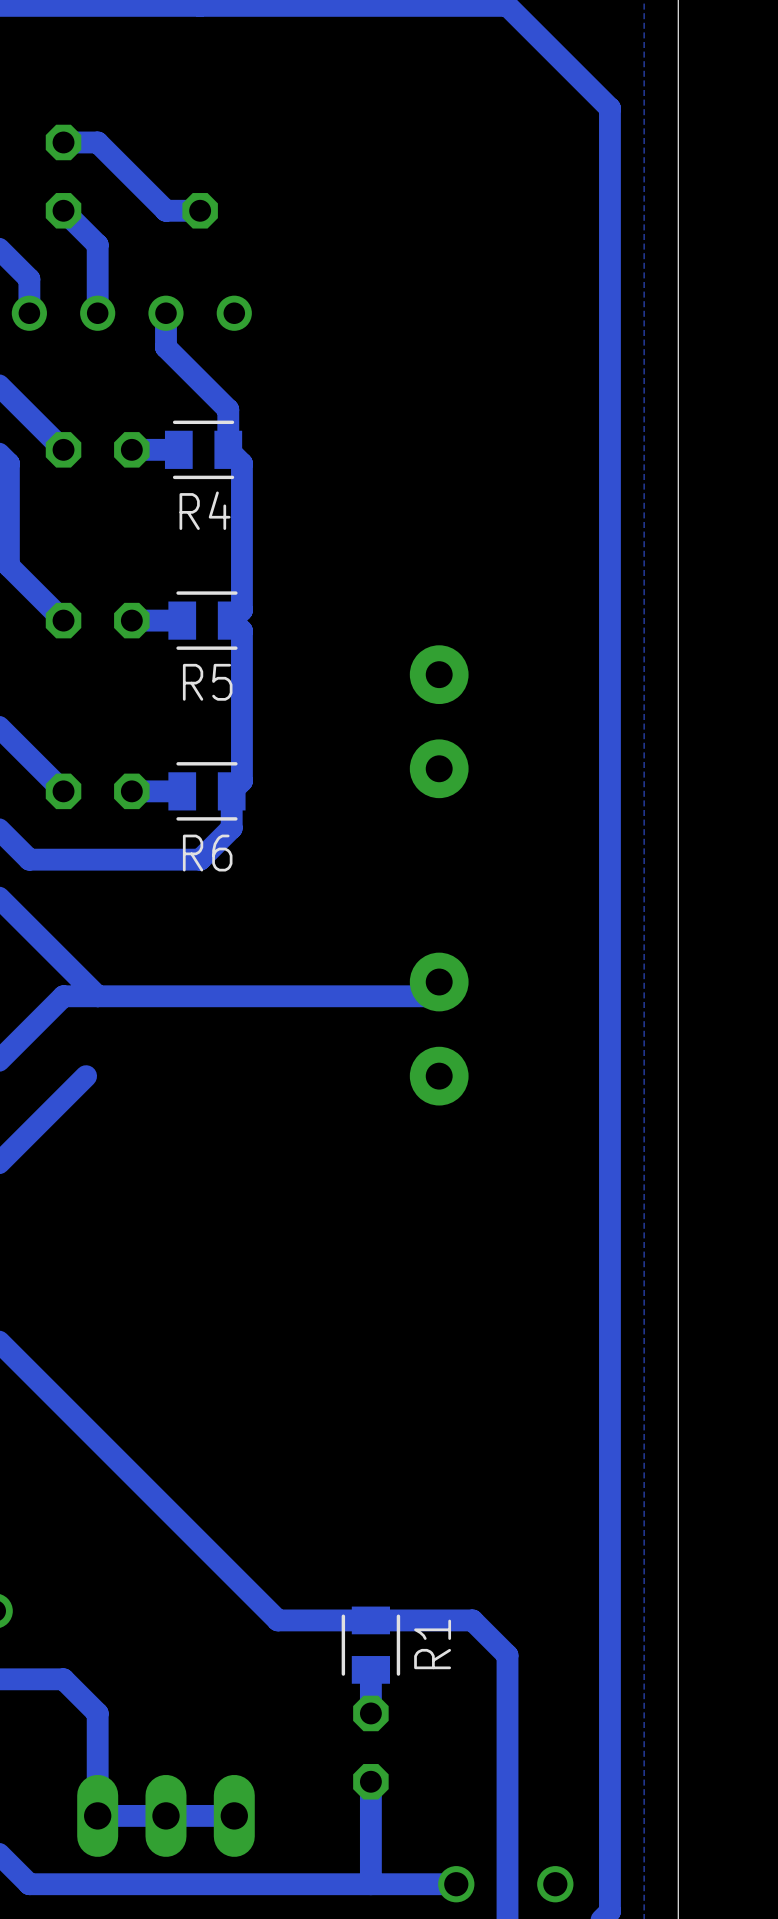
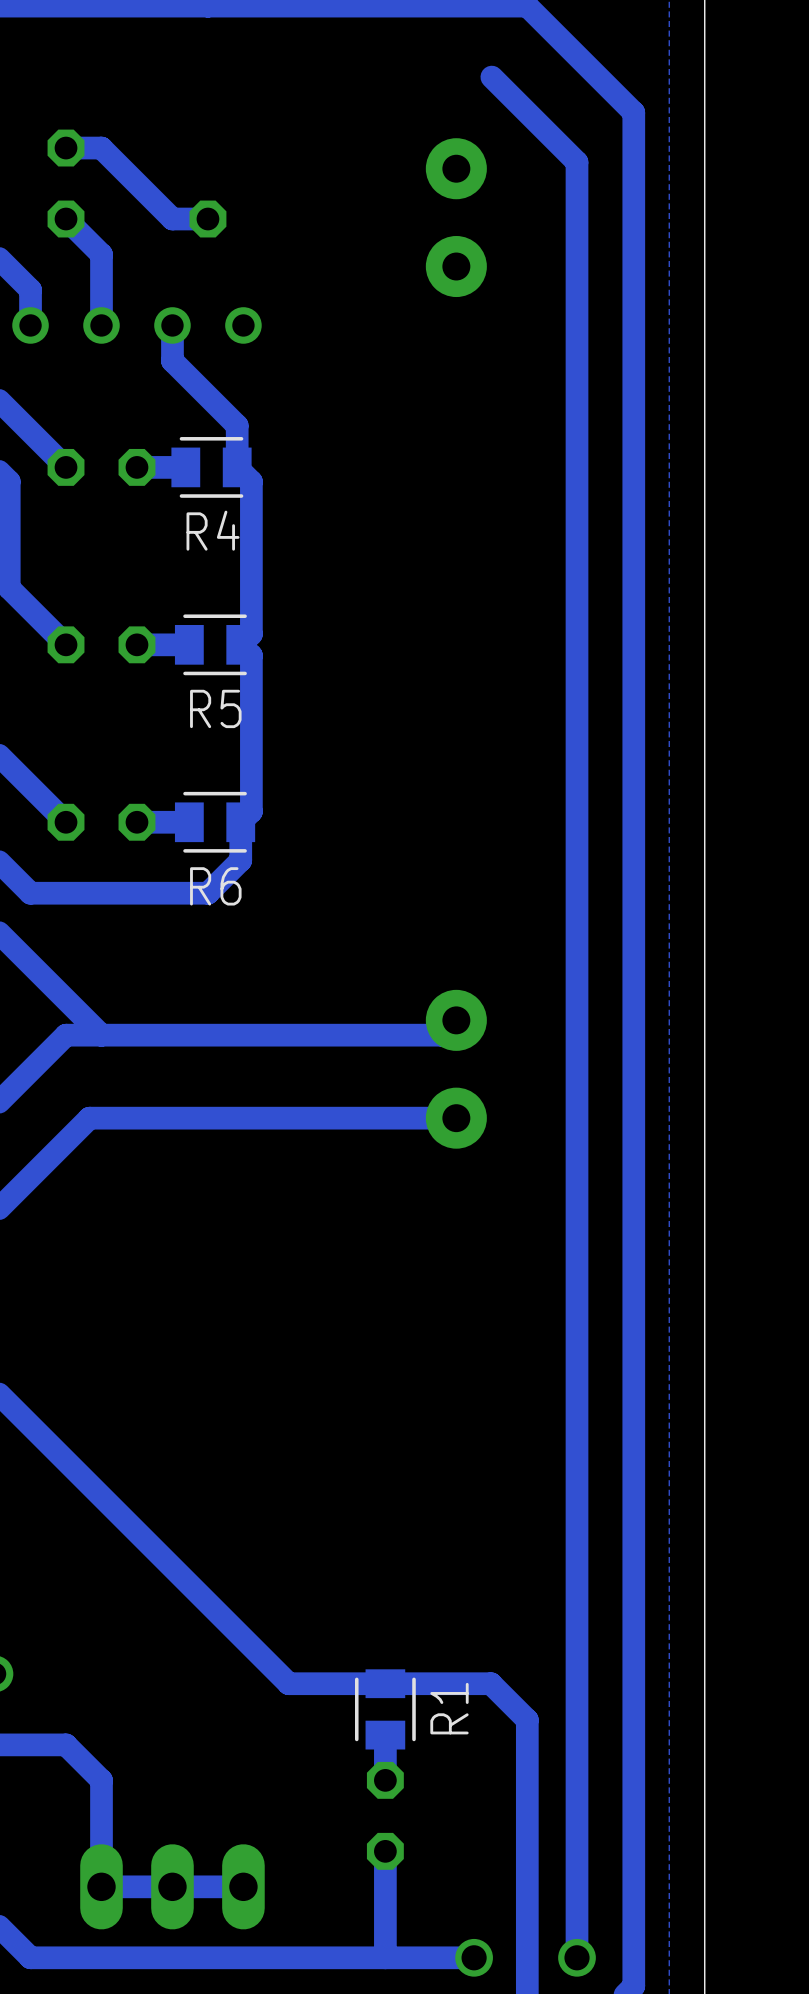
track: none -> (491, 77) (577, 162) (577, 1957)
part position: (439, 721) -> (456, 217)
track: none -> (456, 1118) (89, 1118)

